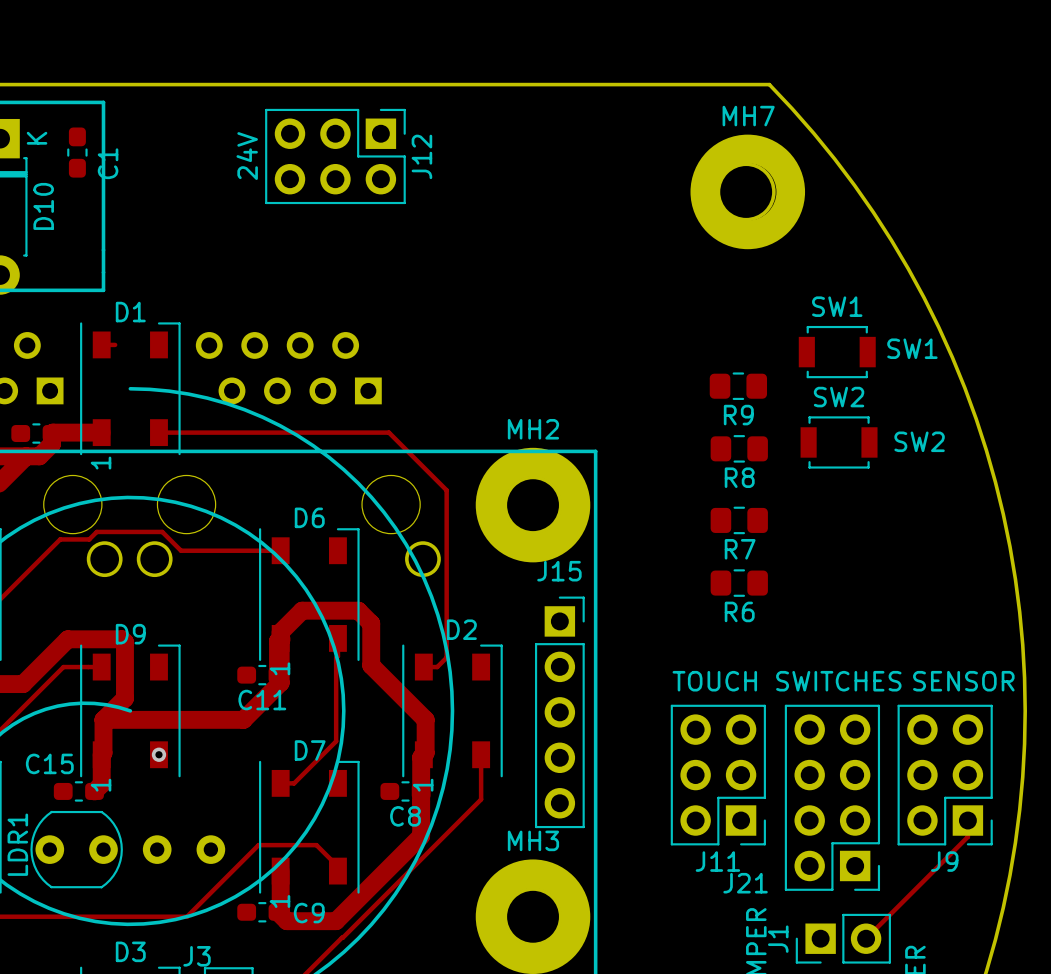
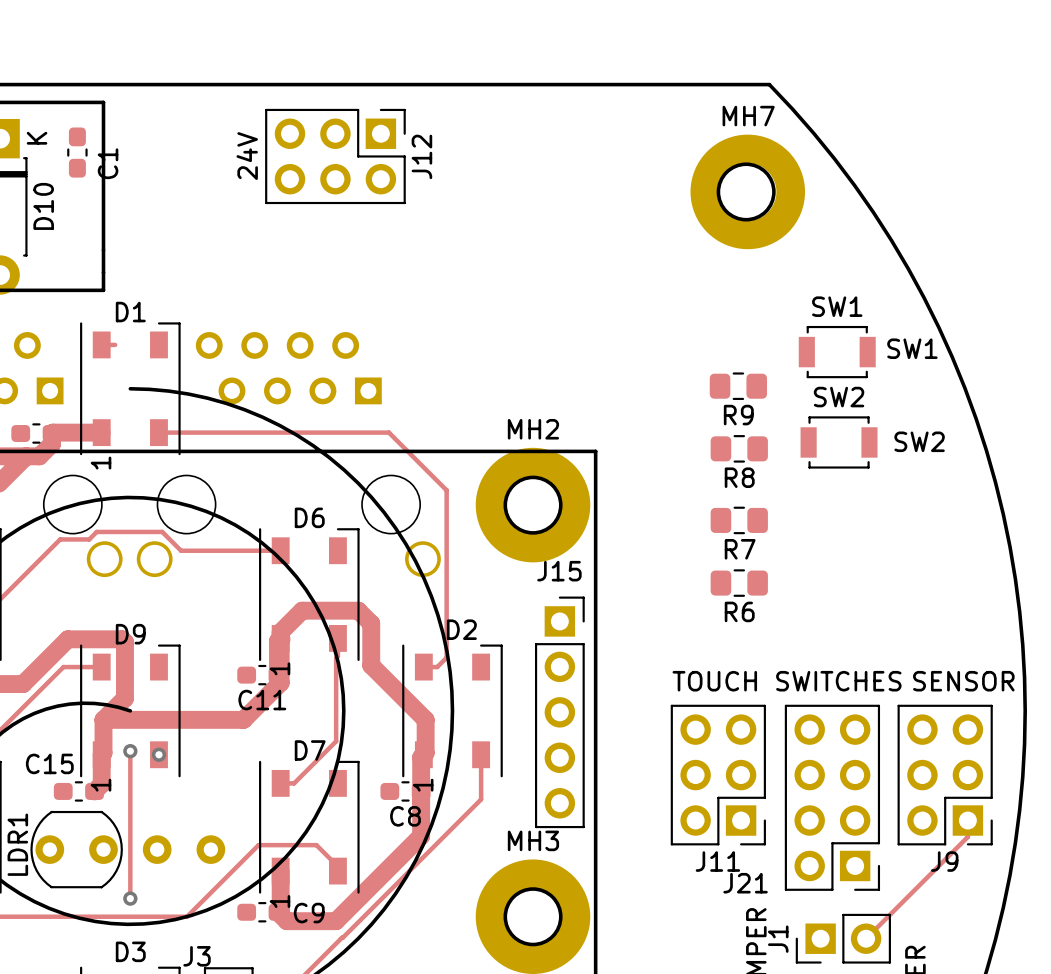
track: none -> (130, 751) (130, 898)
via: none -> (130, 751)
via: none -> (130, 898)

